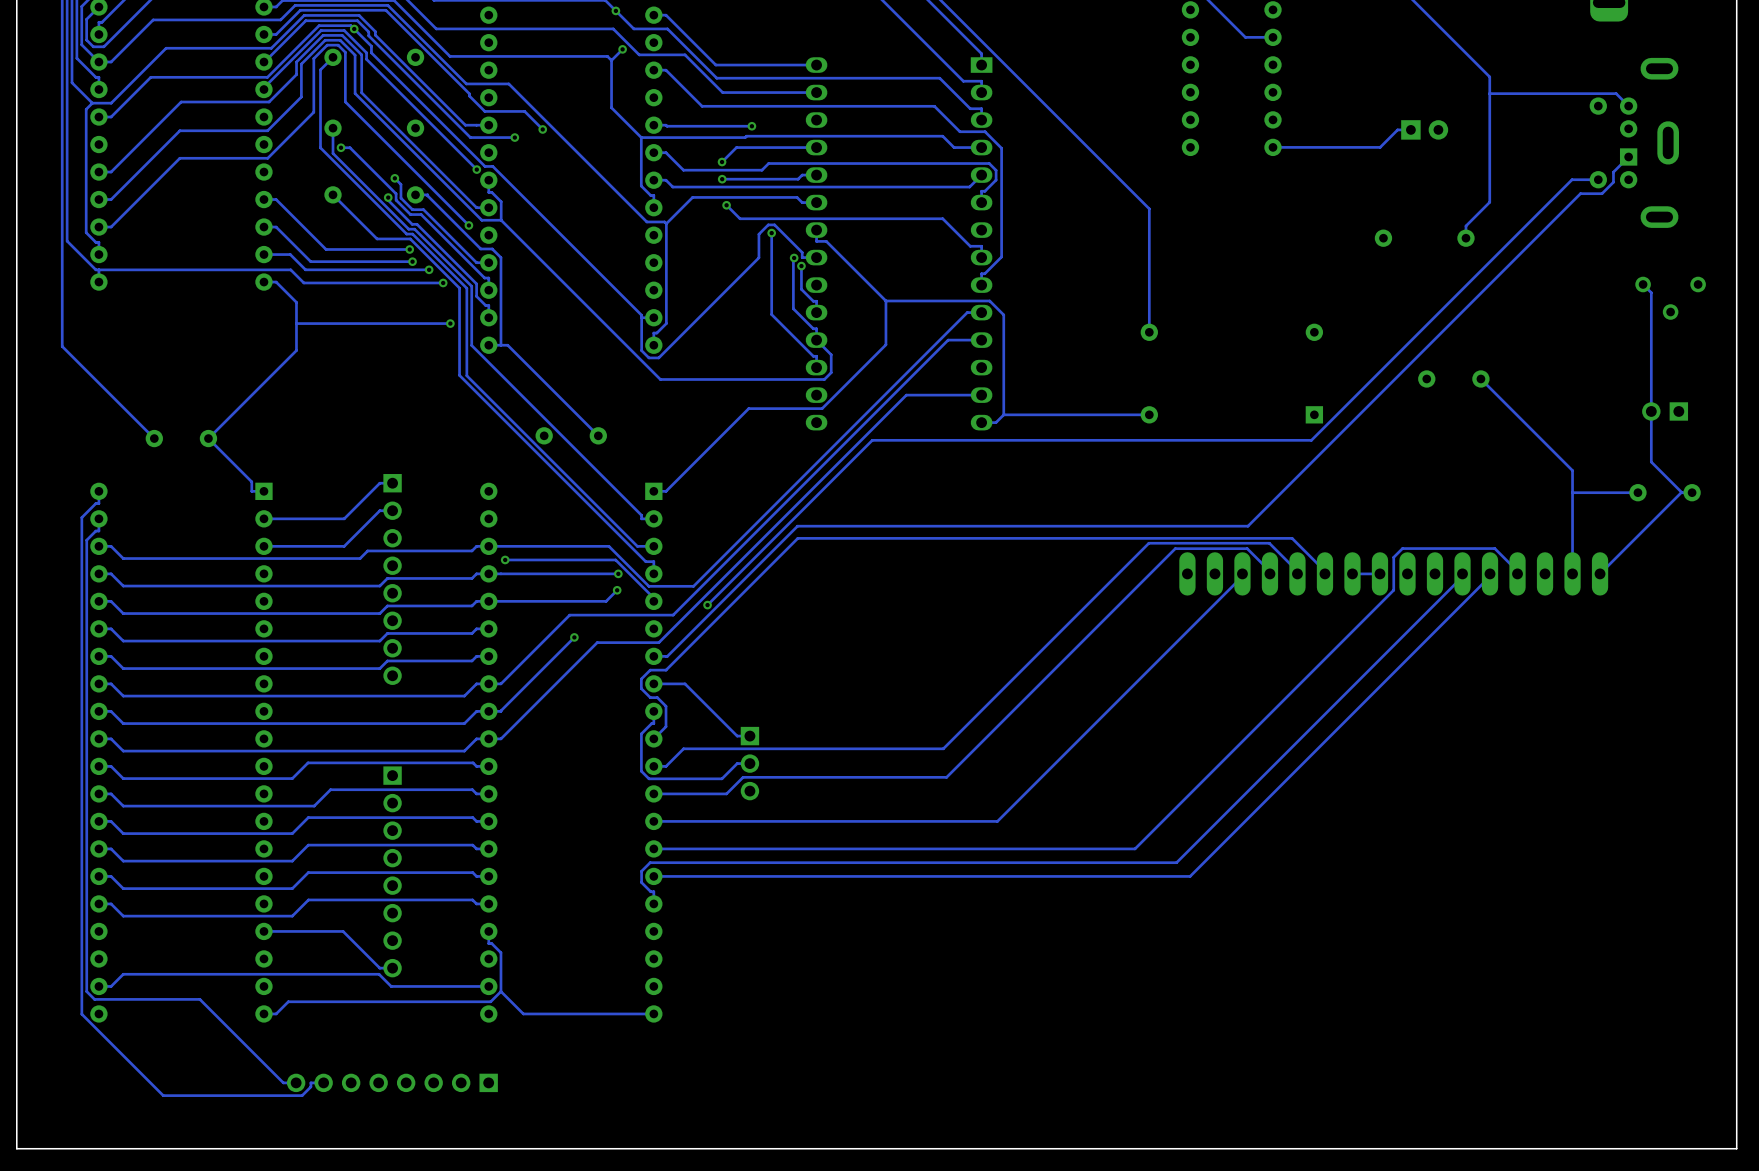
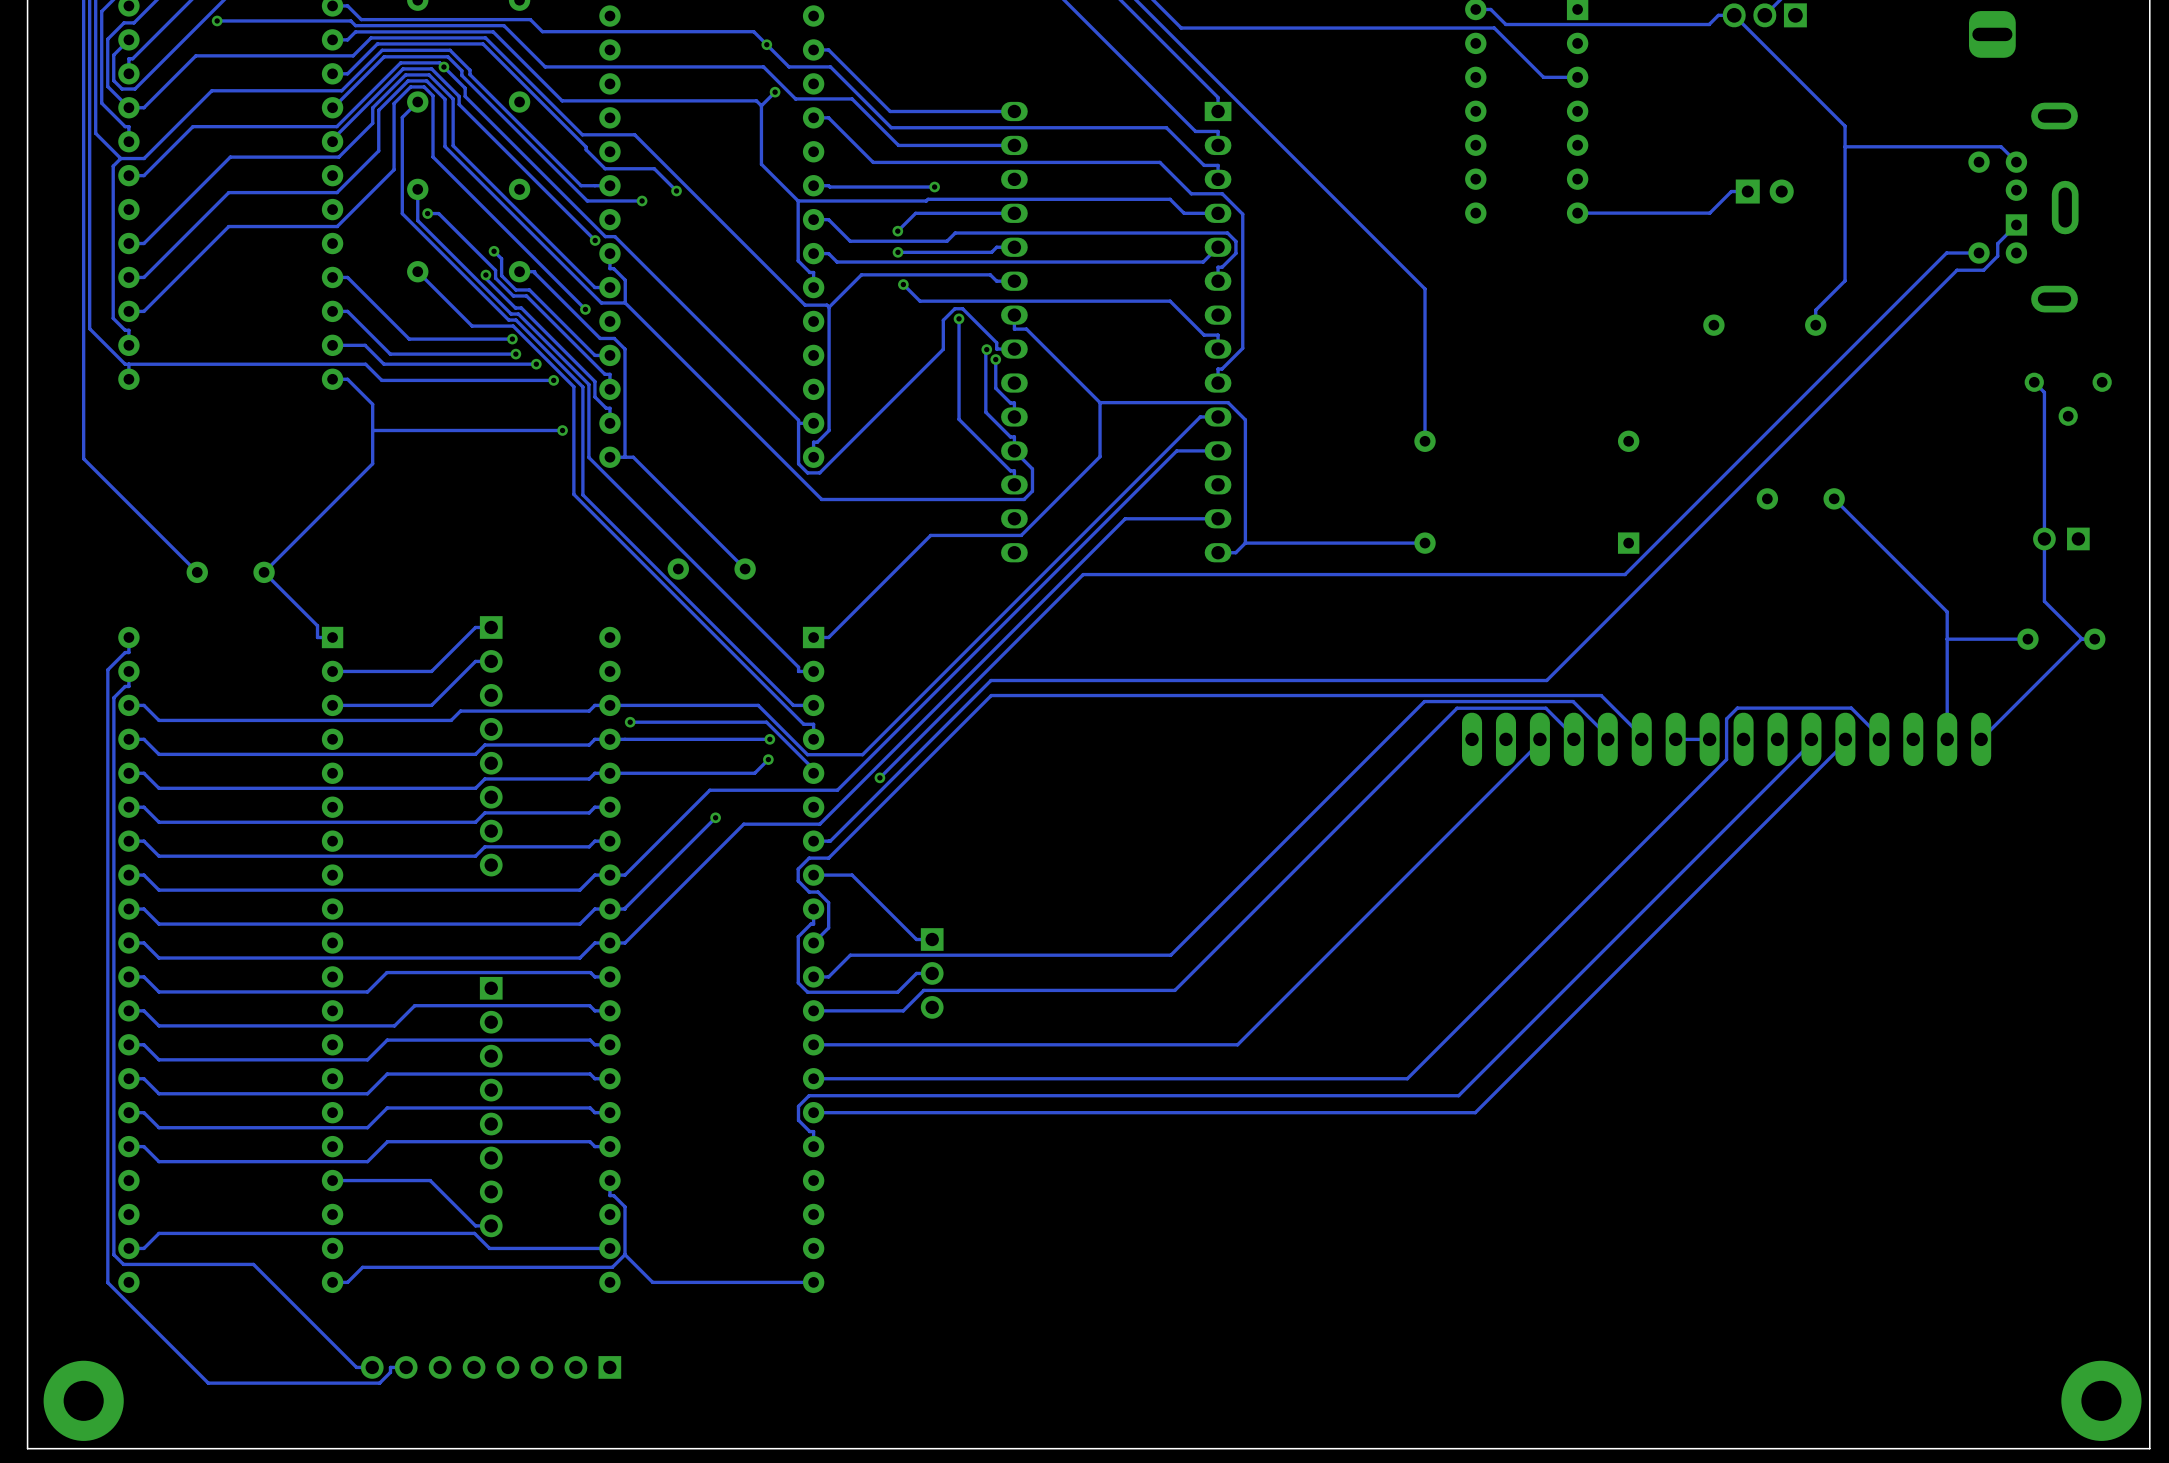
part: none -> (83, 1400)
part: none -> (2101, 1400)

